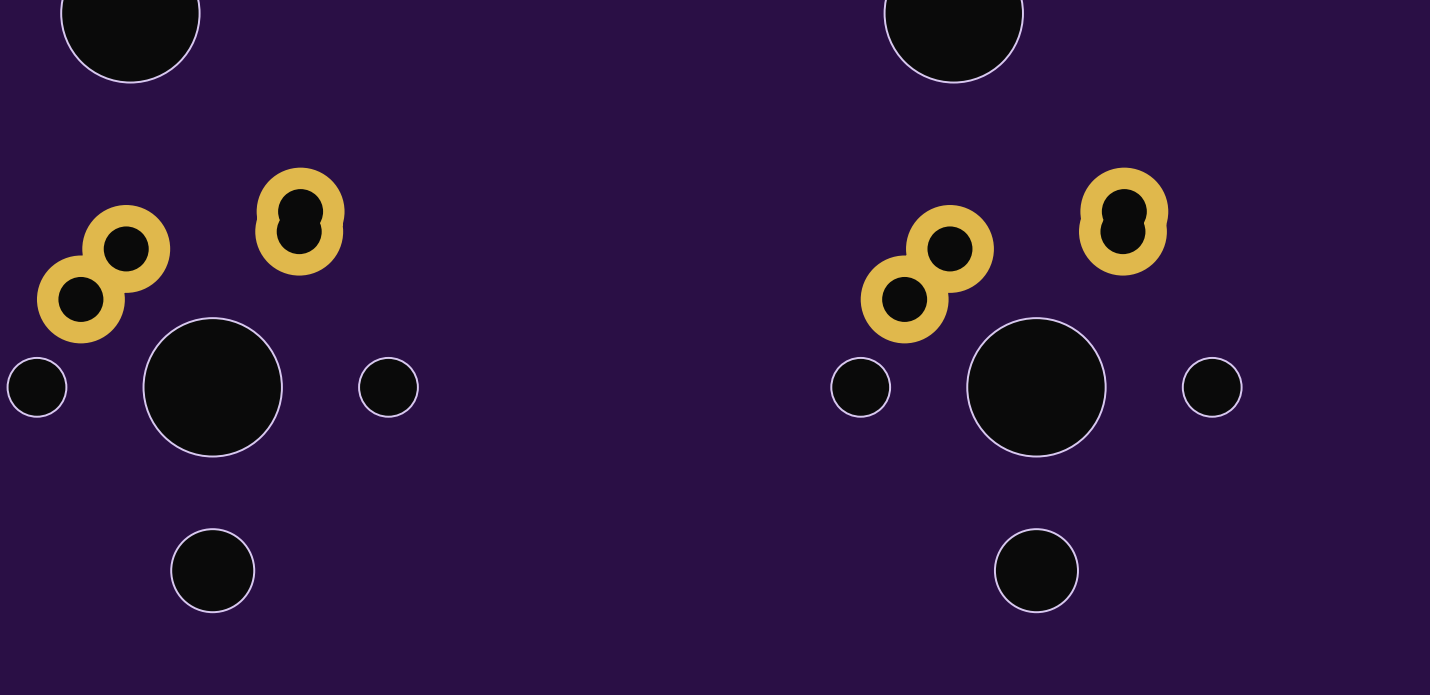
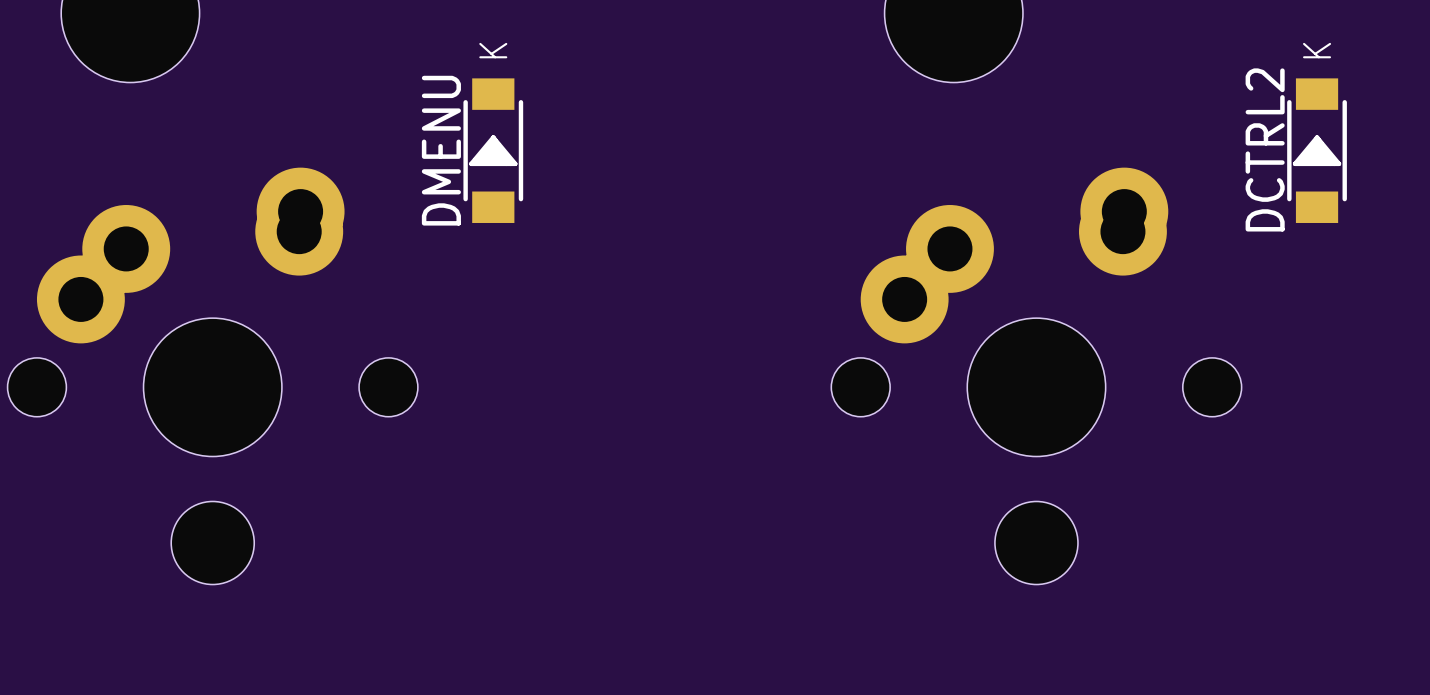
DMENU: none -> (493, 150)
DCTRL2: none -> (1317, 150)
part footprint: [7, 167, 418, 613] -> [7, 167, 418, 585]
part footprint: [831, 167, 1242, 613] -> [831, 167, 1242, 585]

